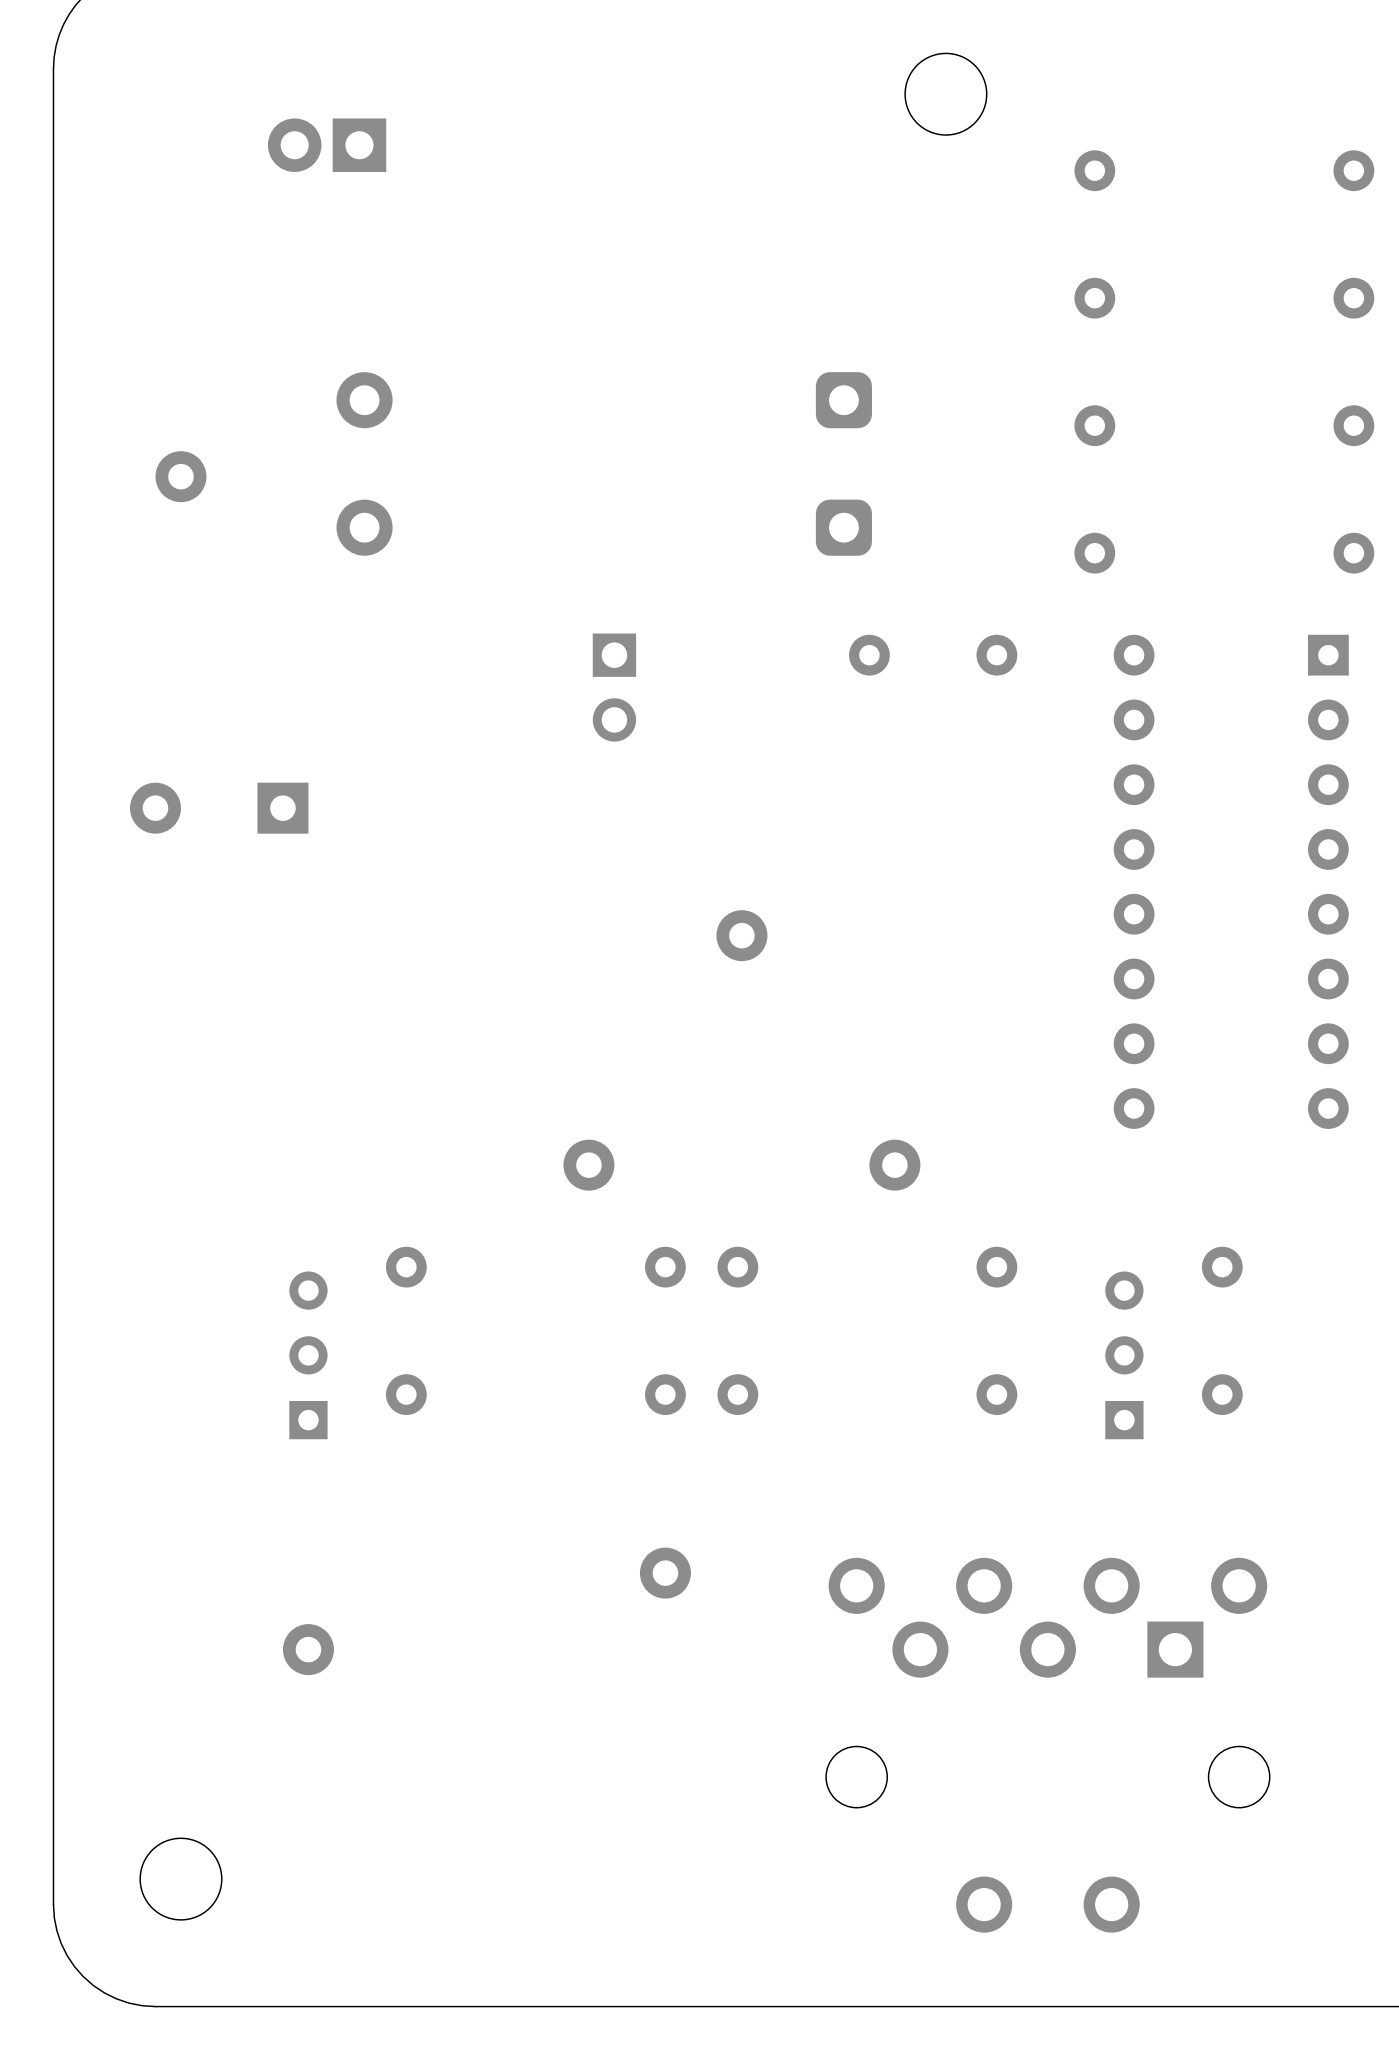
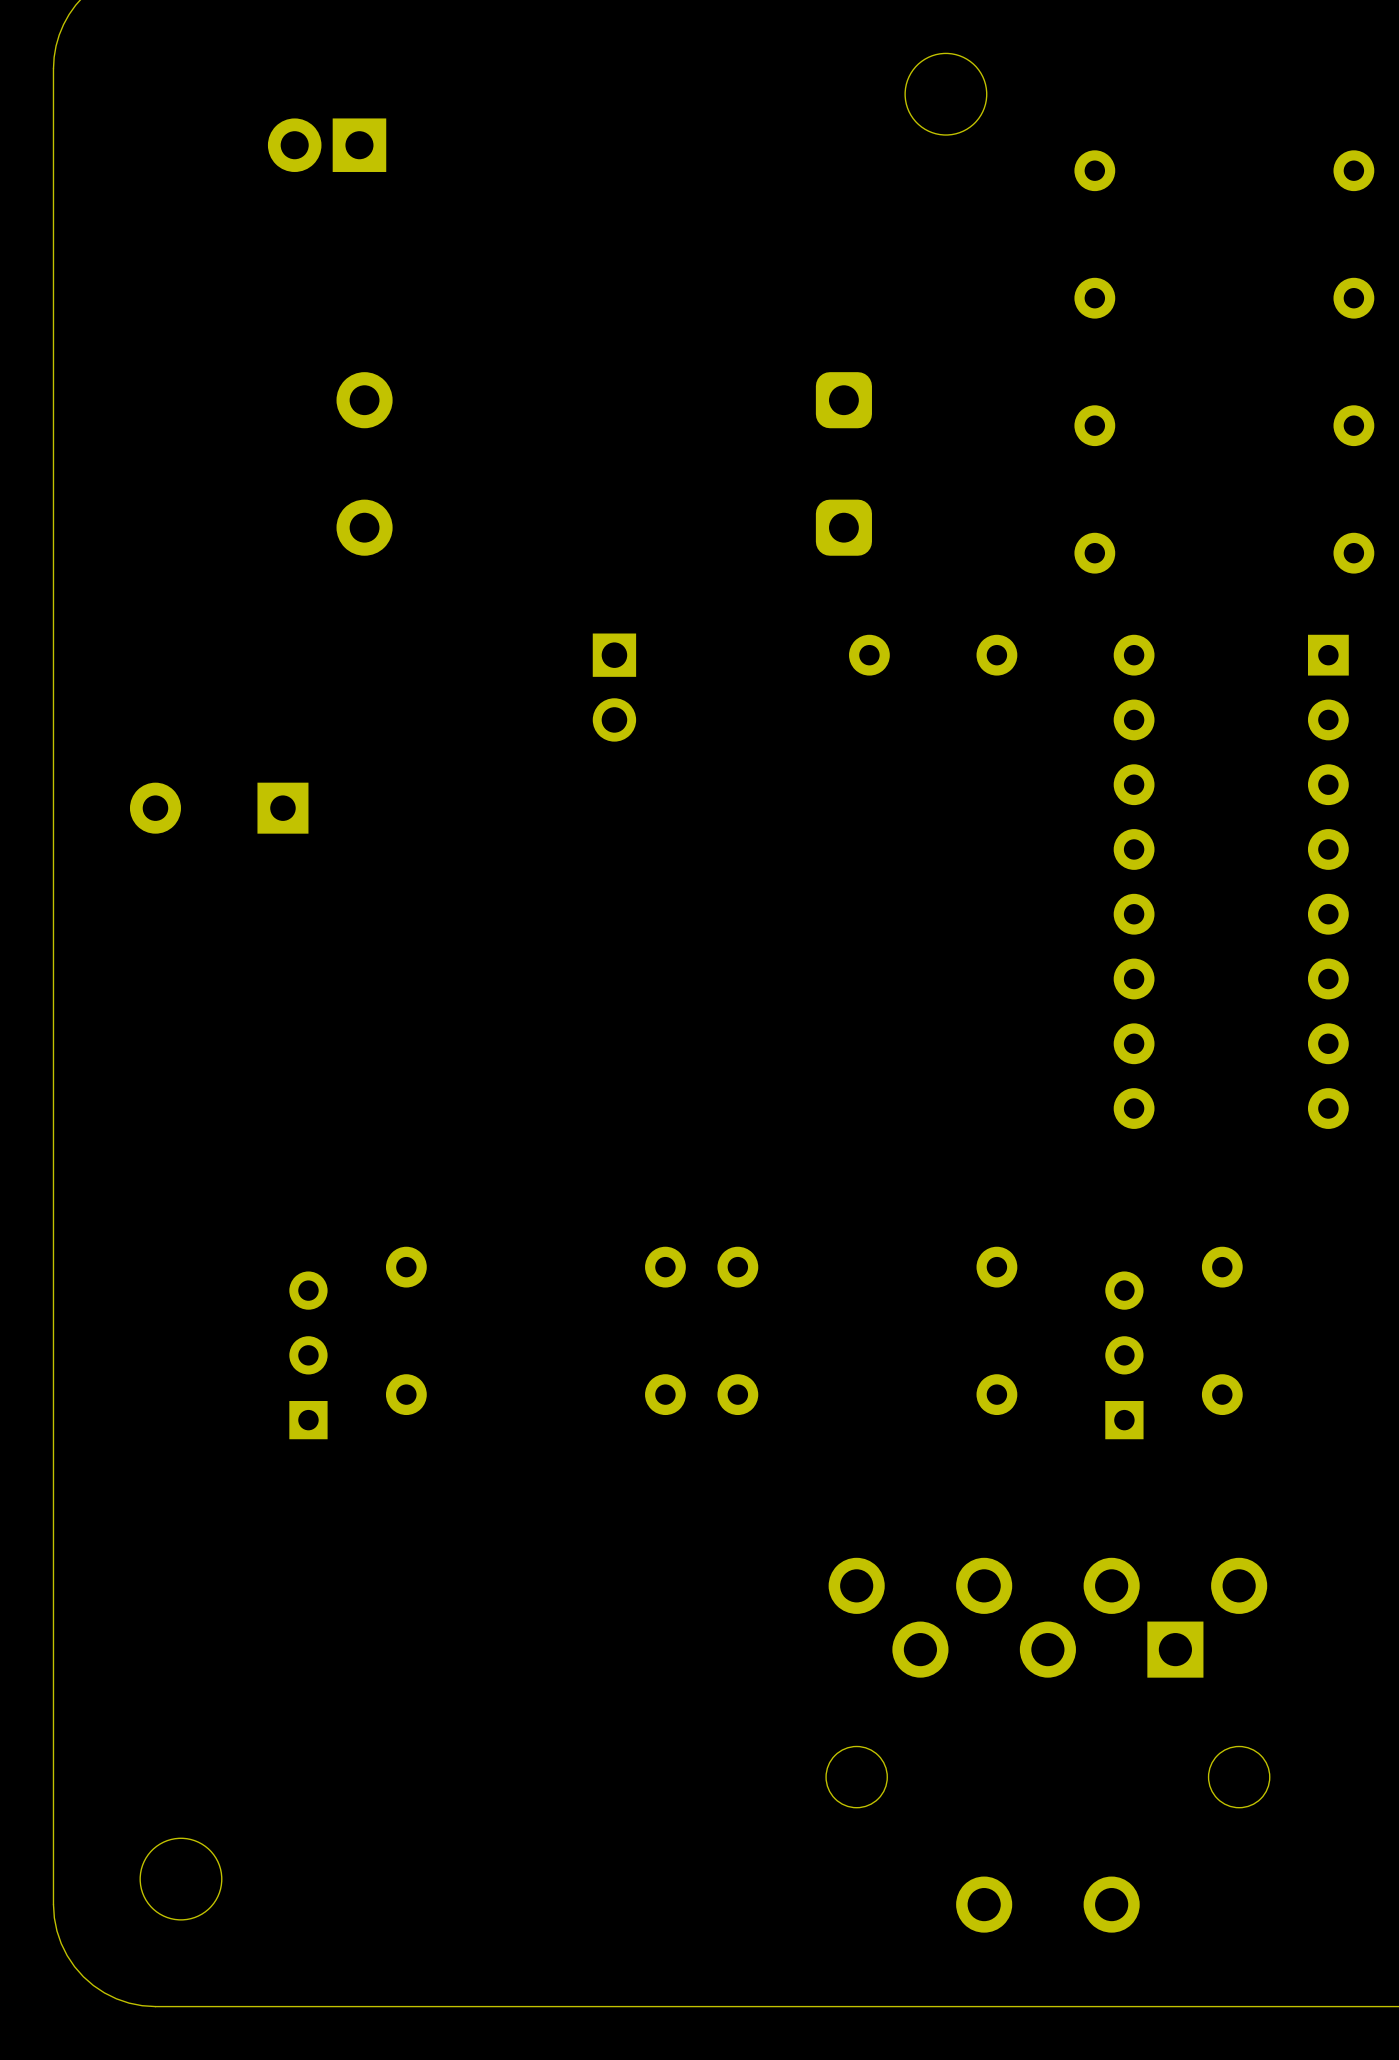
part: (180, 476) -> none
part: (741, 935) -> none
part: (588, 1165) -> none
part: (894, 1165) -> none
part: (665, 1573) -> none
part: (308, 1649) -> none

